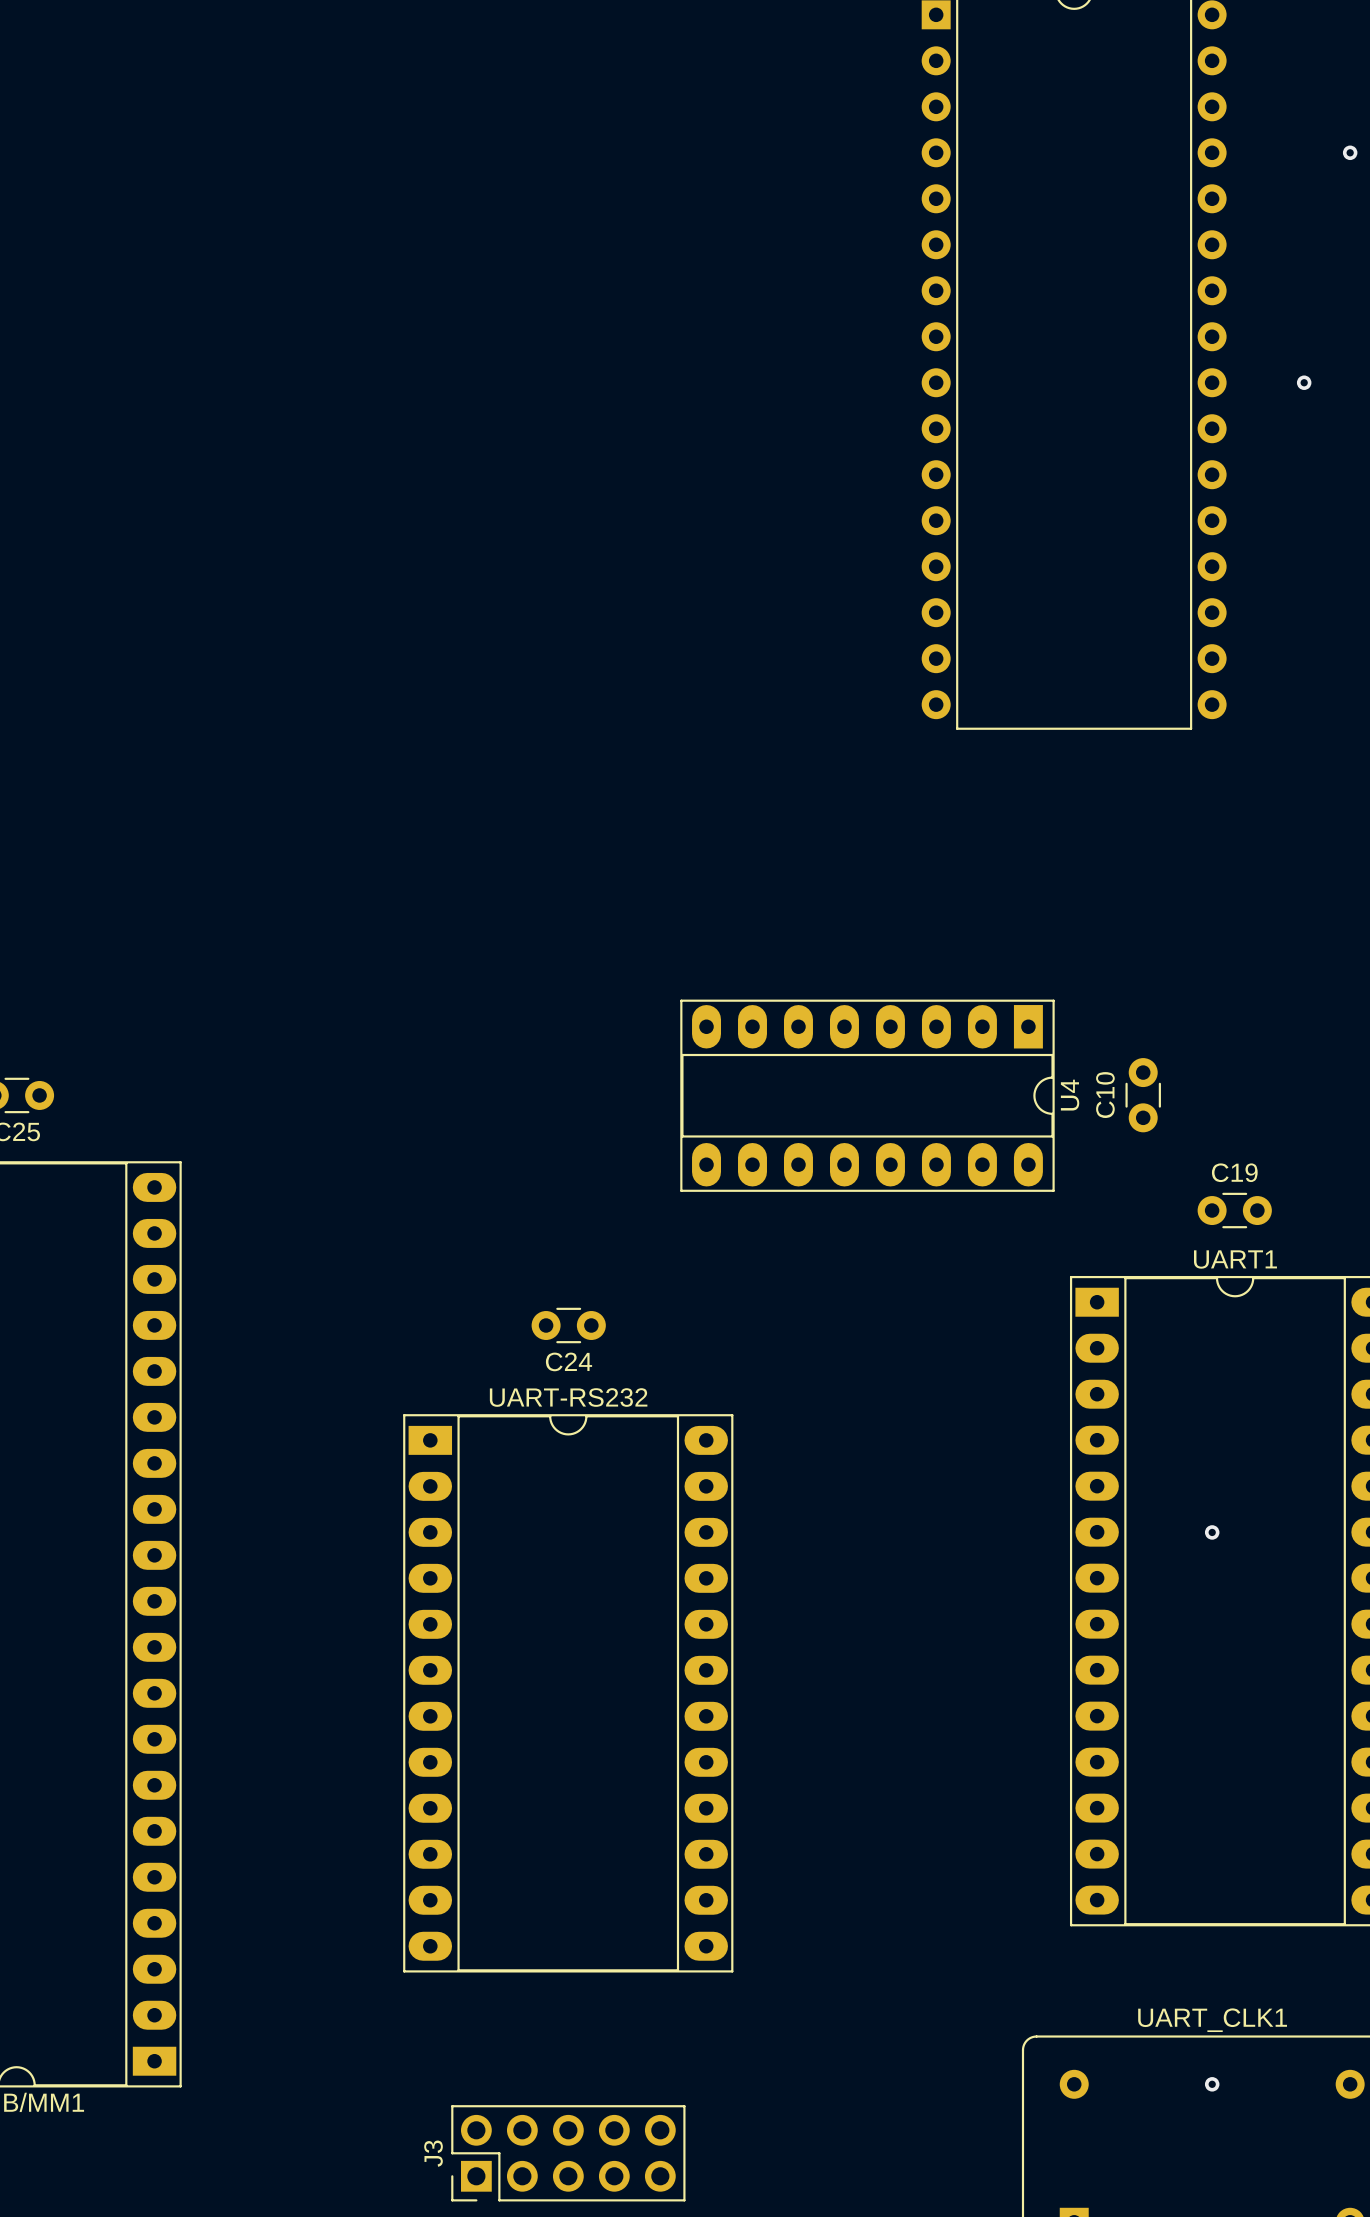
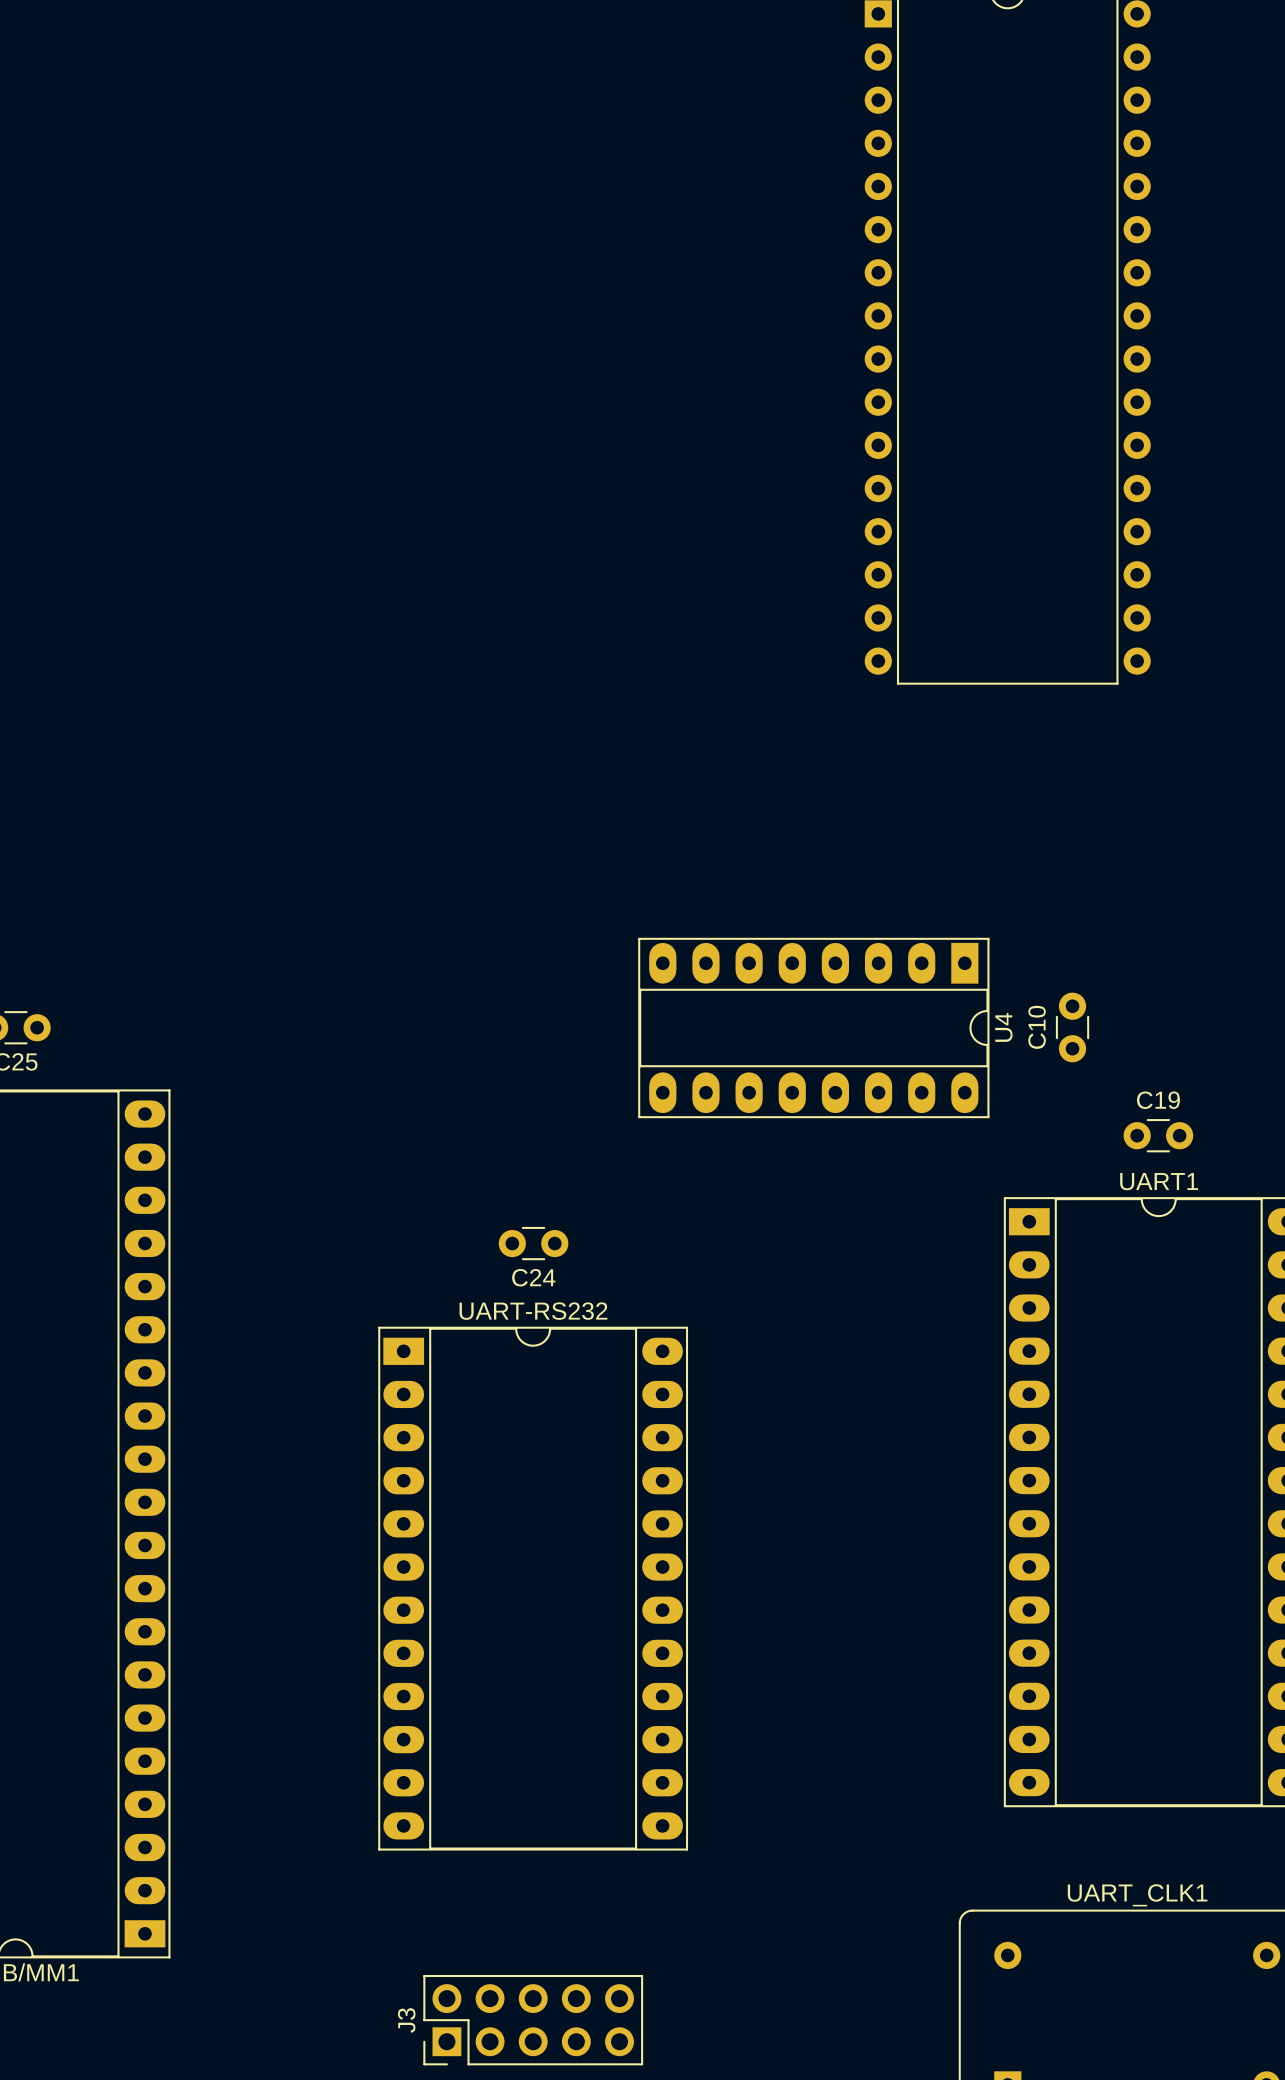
via: (1350, 152) -> none
via: (1304, 382) -> none
via: (1212, 1532) -> none
via: (1212, 2084) -> none

